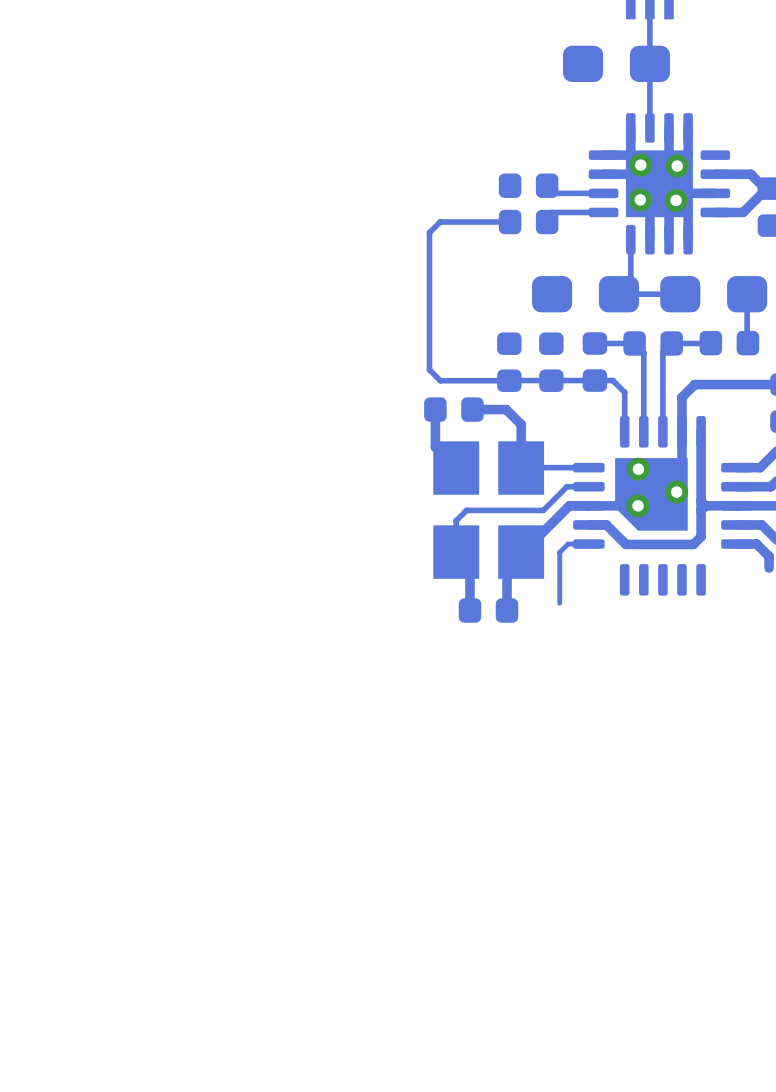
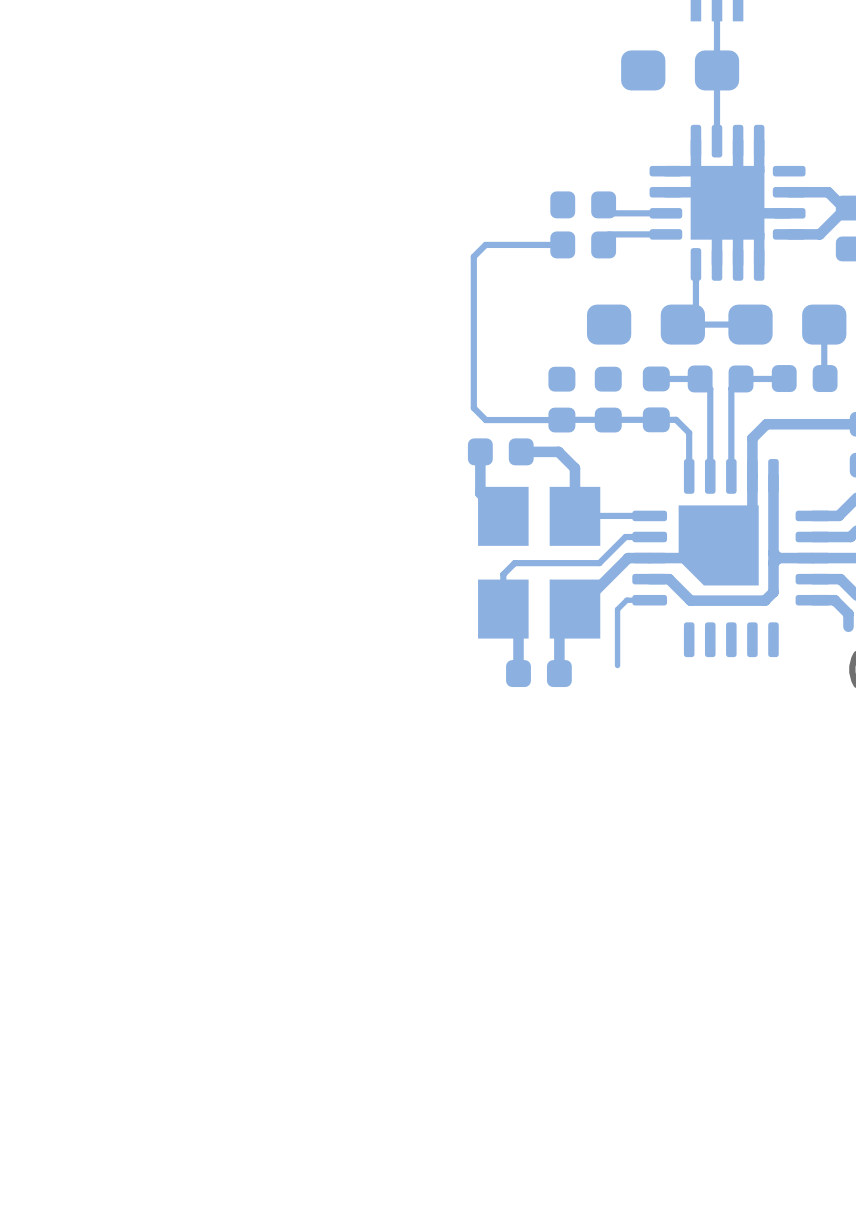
via: (640, 165) -> none
via: (677, 166) -> none
via: (640, 199) -> none
via: (676, 200) -> none
via: (638, 469) -> none
via: (676, 492) -> none
via: (638, 505) -> none

